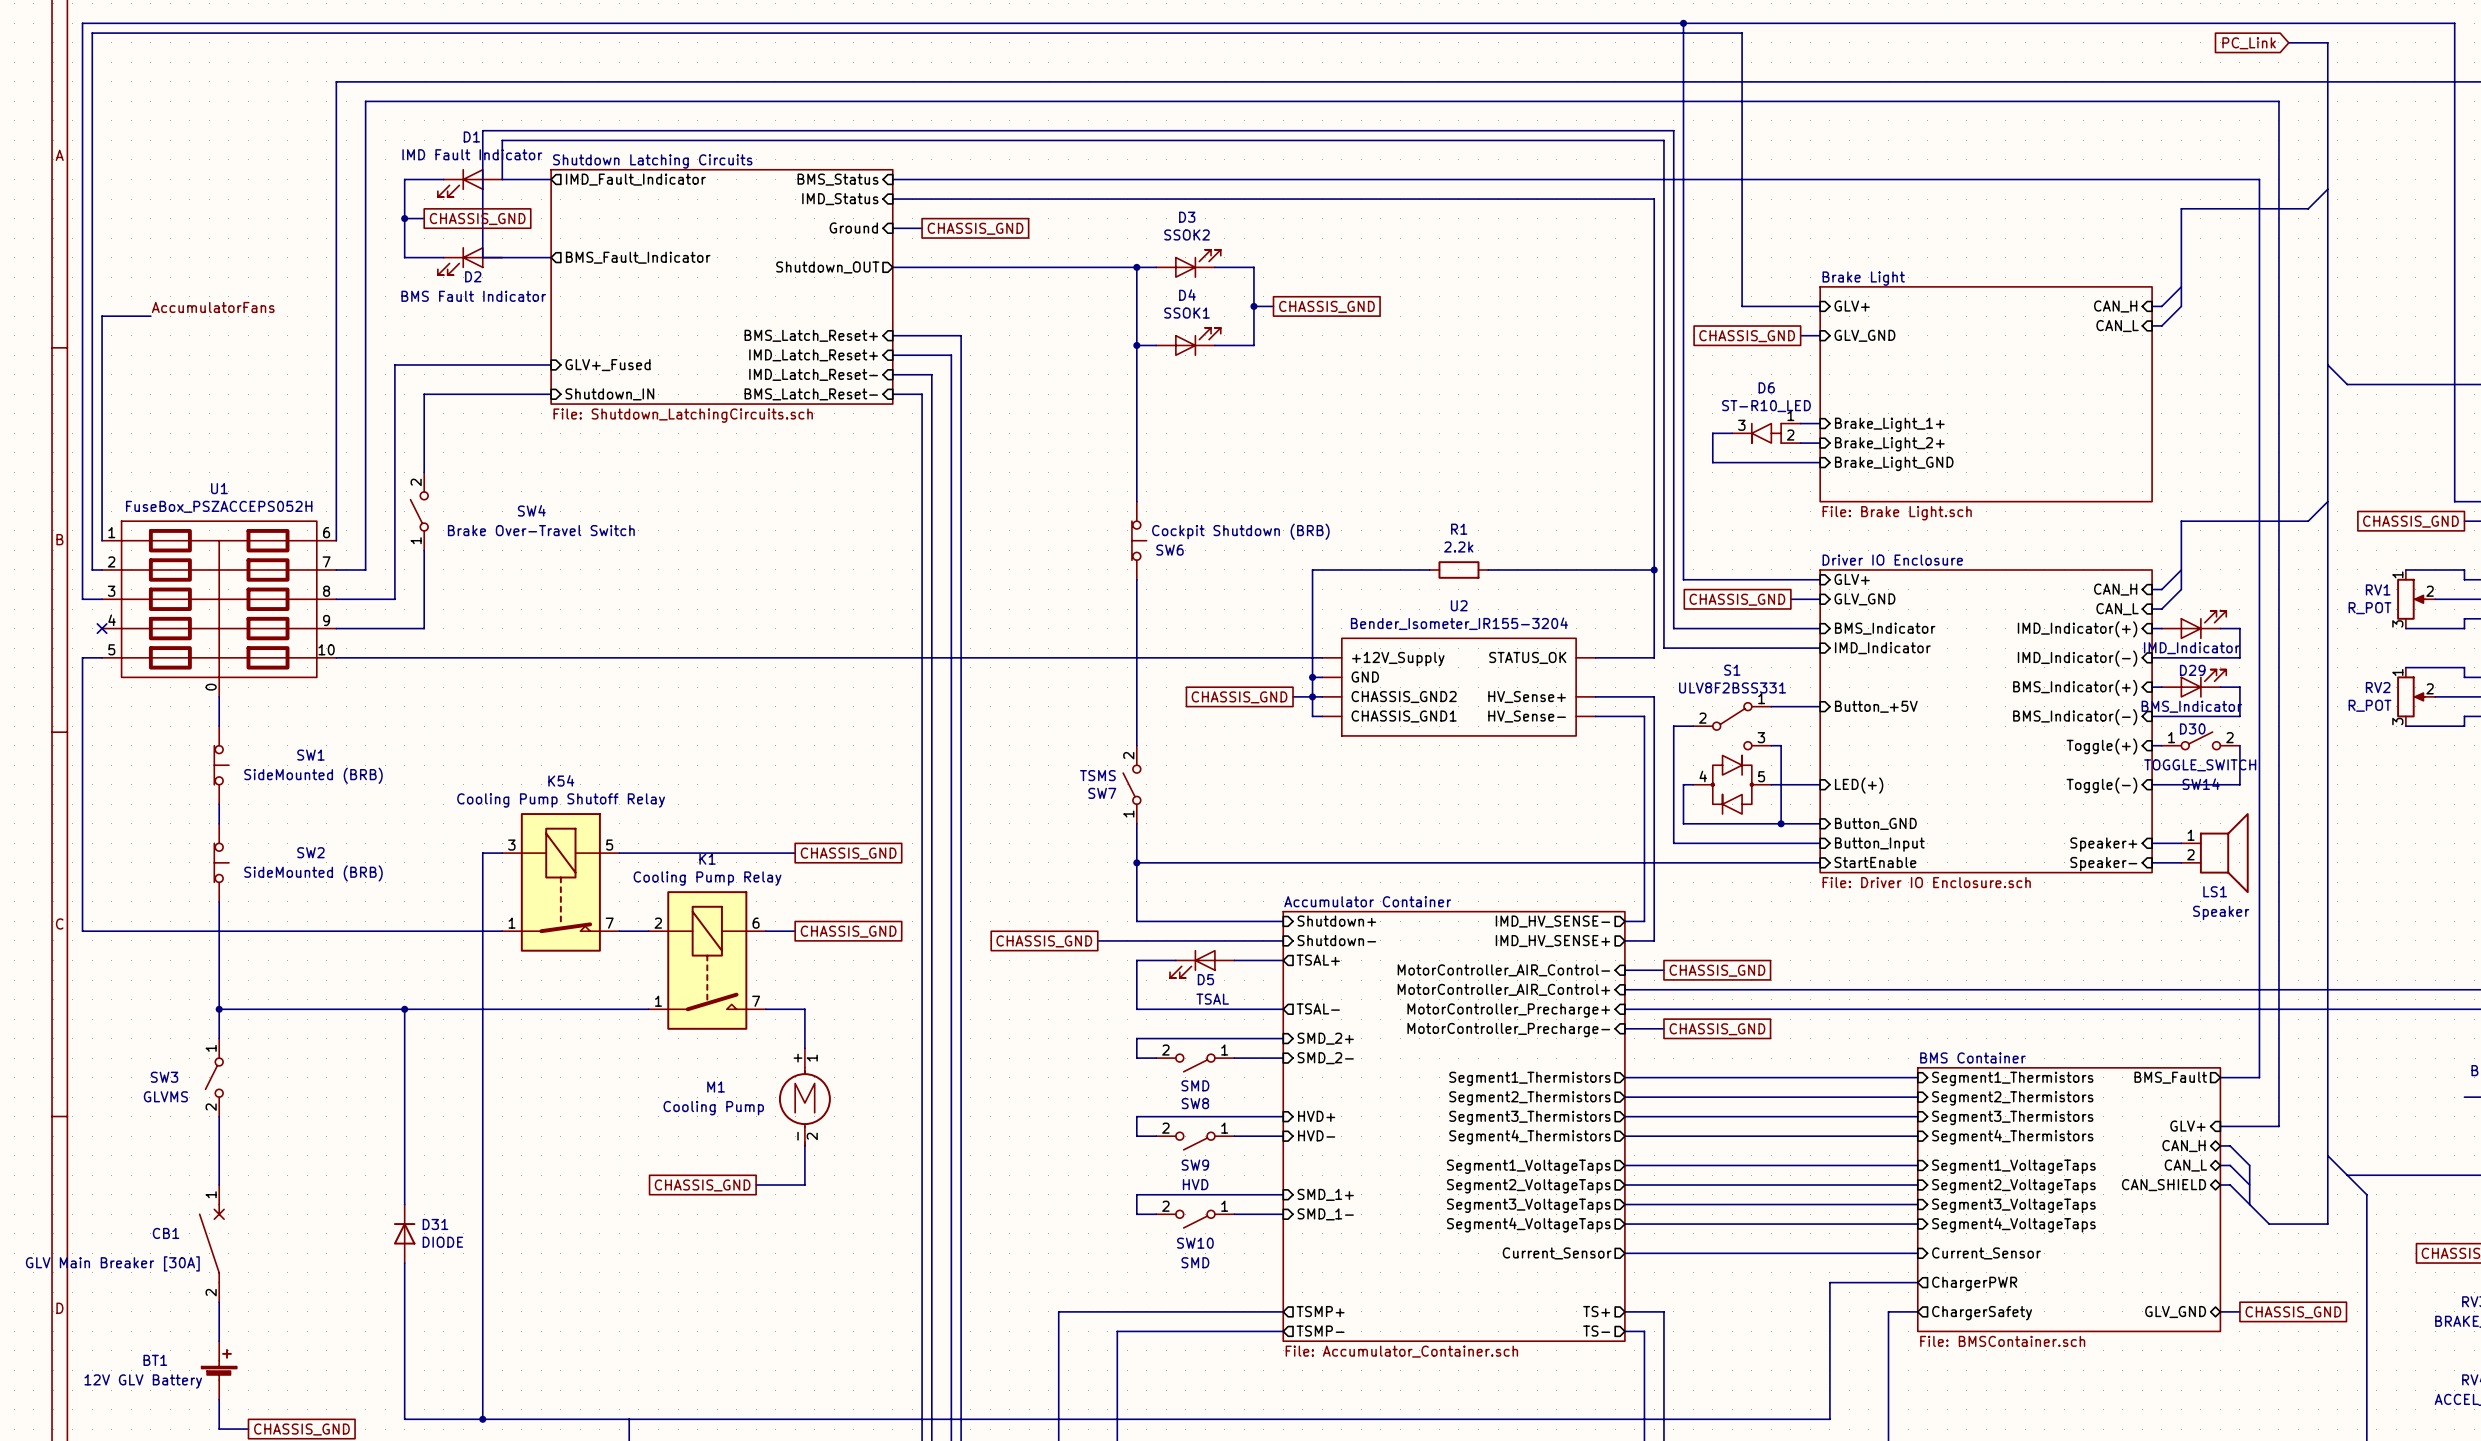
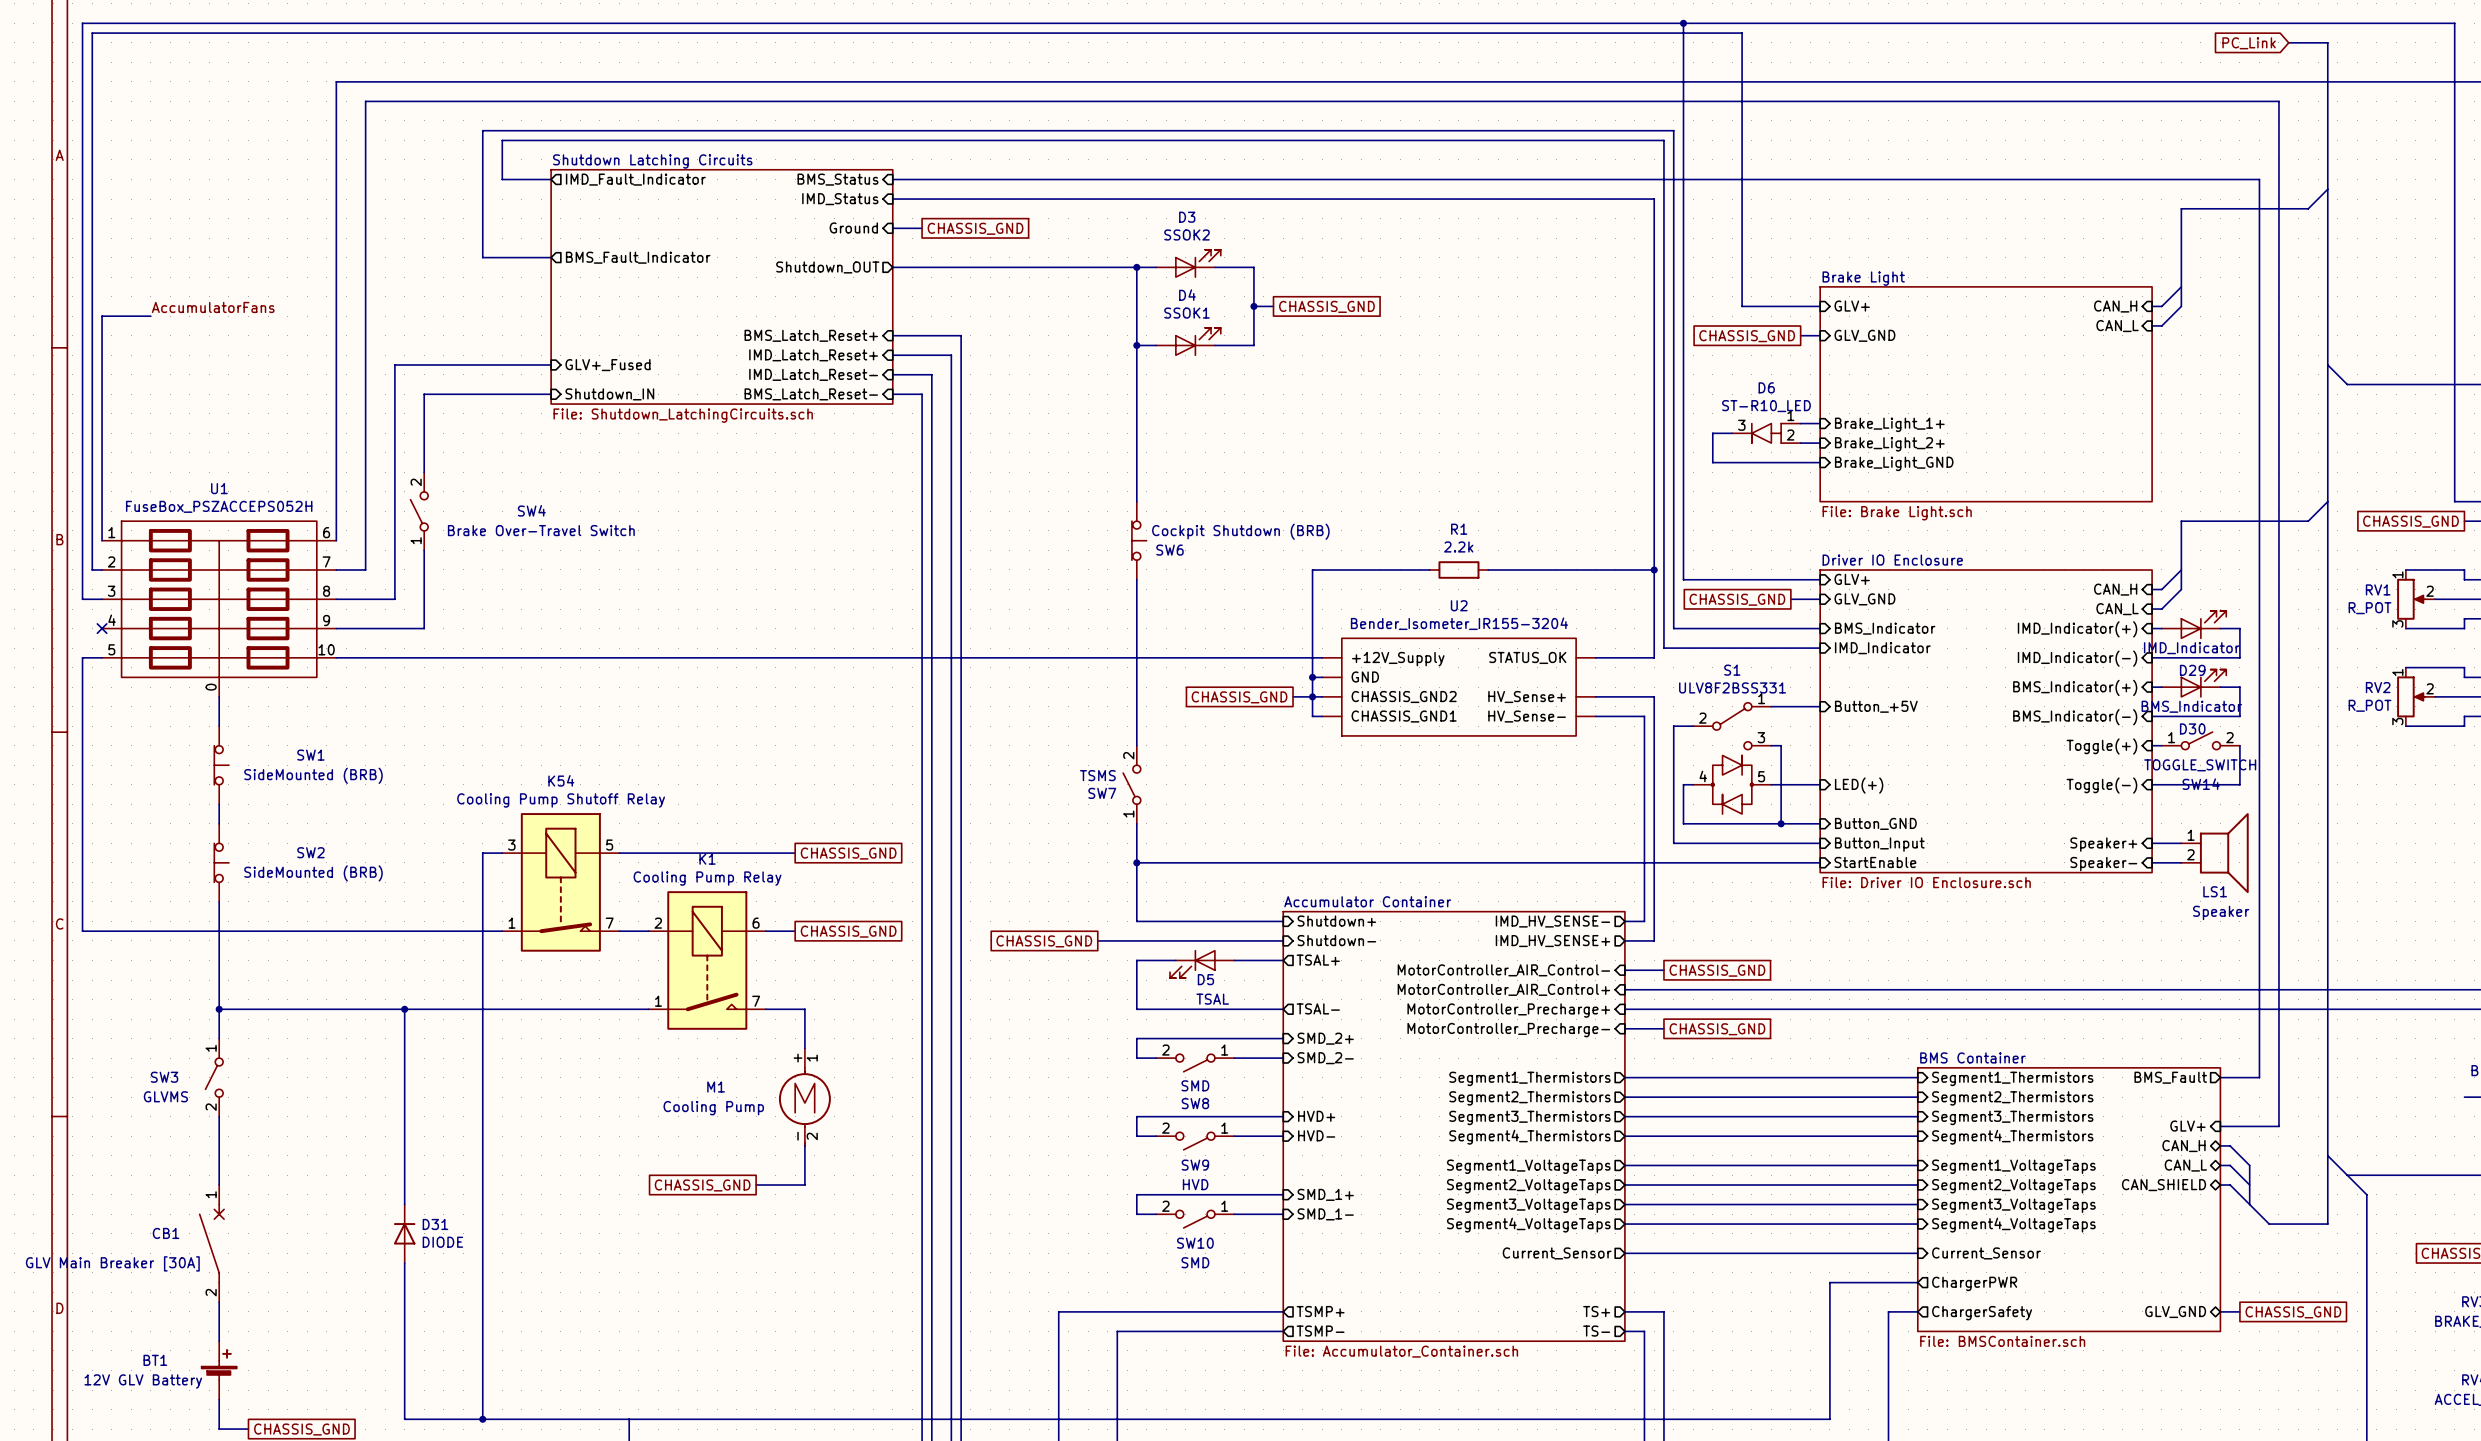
wire: (443, 179) (404, 179) (404, 257) (443, 257) -> none
D1: IMD Fault Indicator (470, 183) -> none
wire: (404, 218) (424, 218) -> none
junction: (404, 218) -> none
global label: CHASSIS_GND (477, 219) -> none
D2: BMS Fault Indicator (470, 261) -> none

